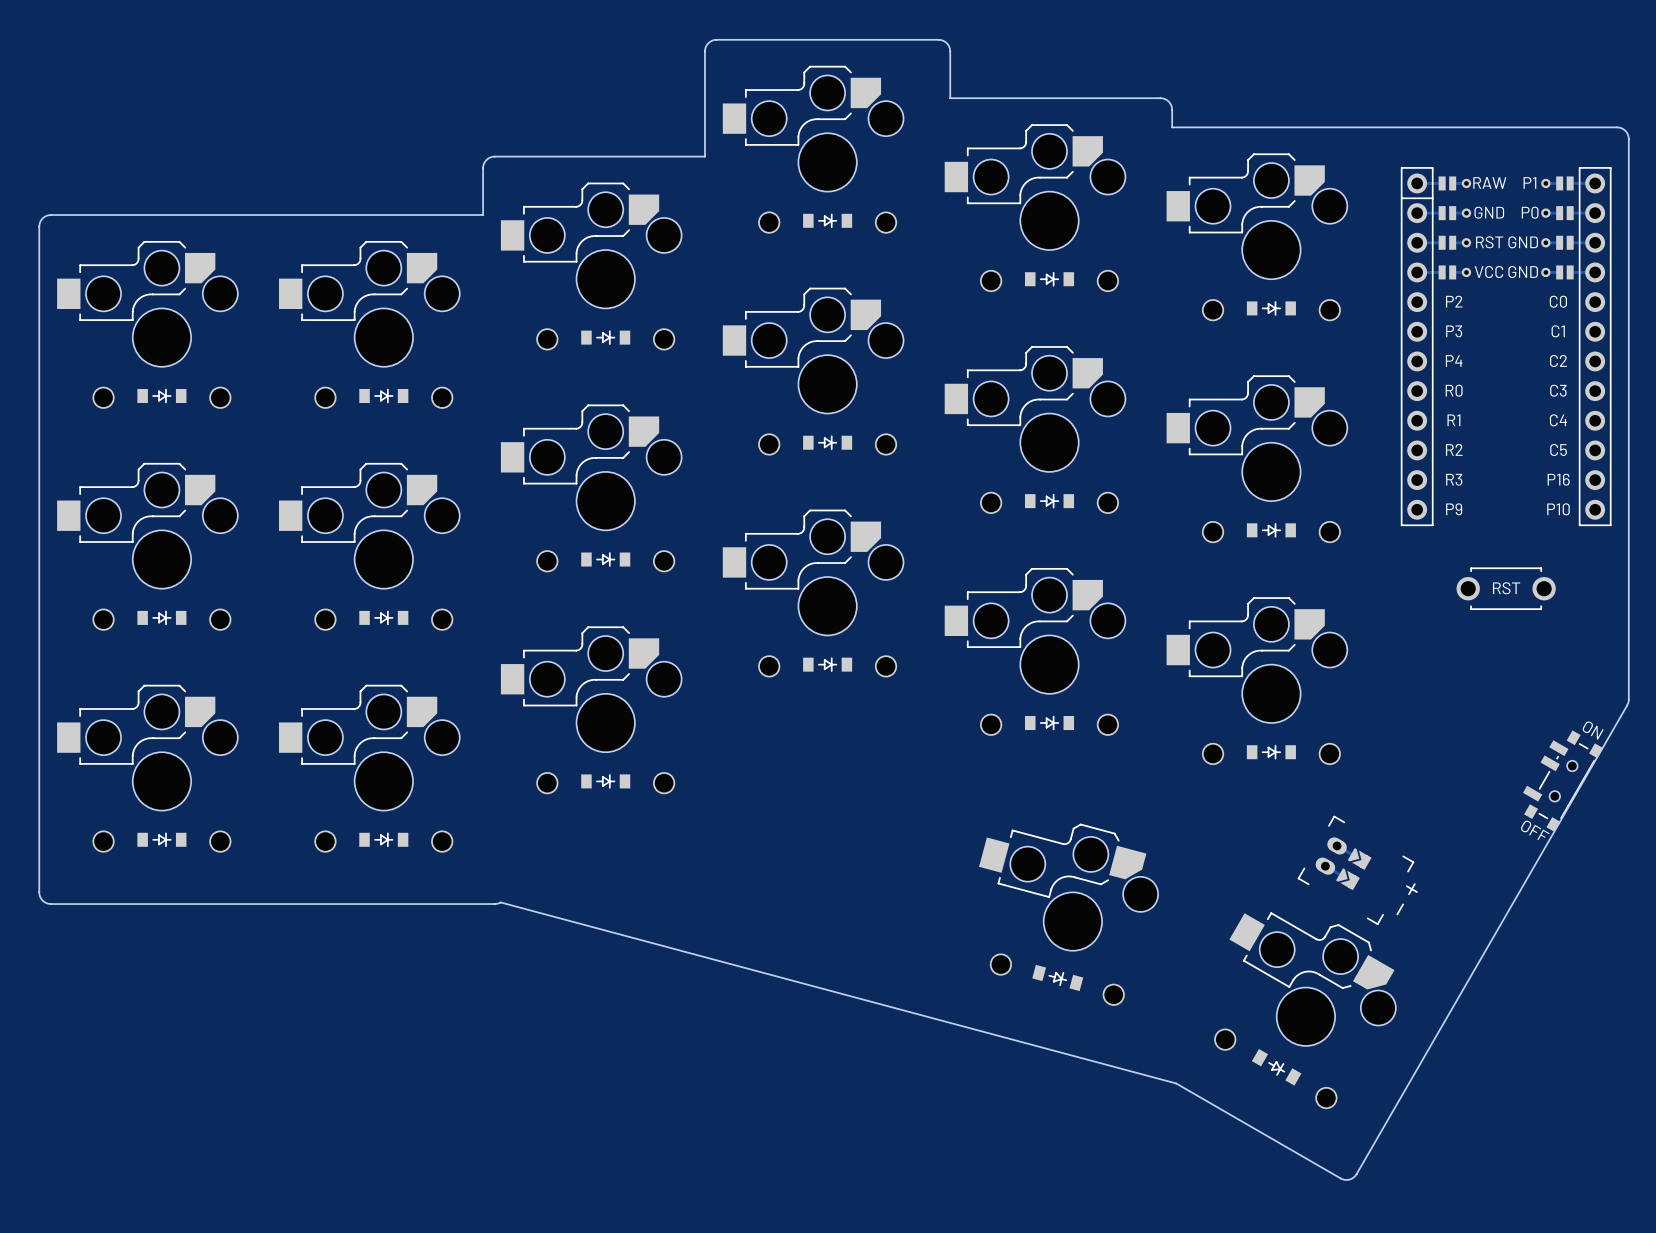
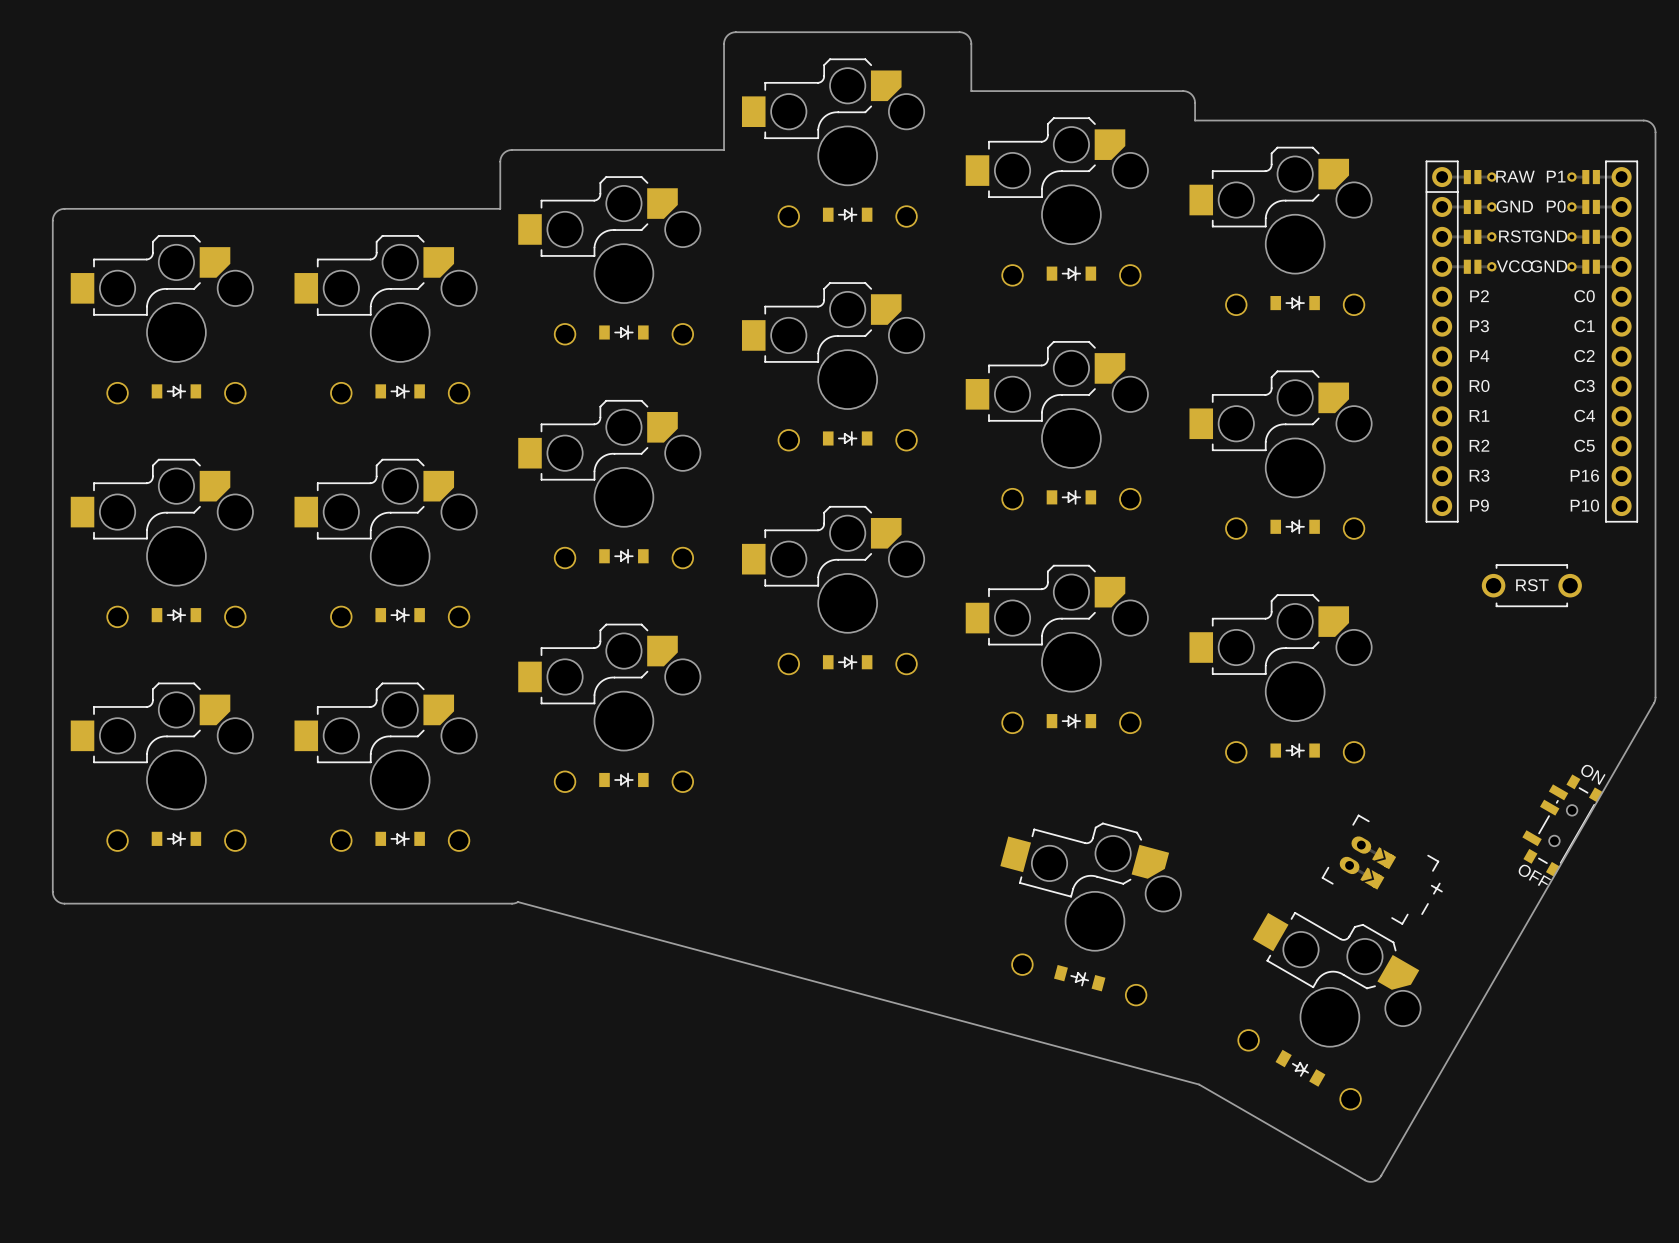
part position: (1563, 781) -> (1562, 825)

